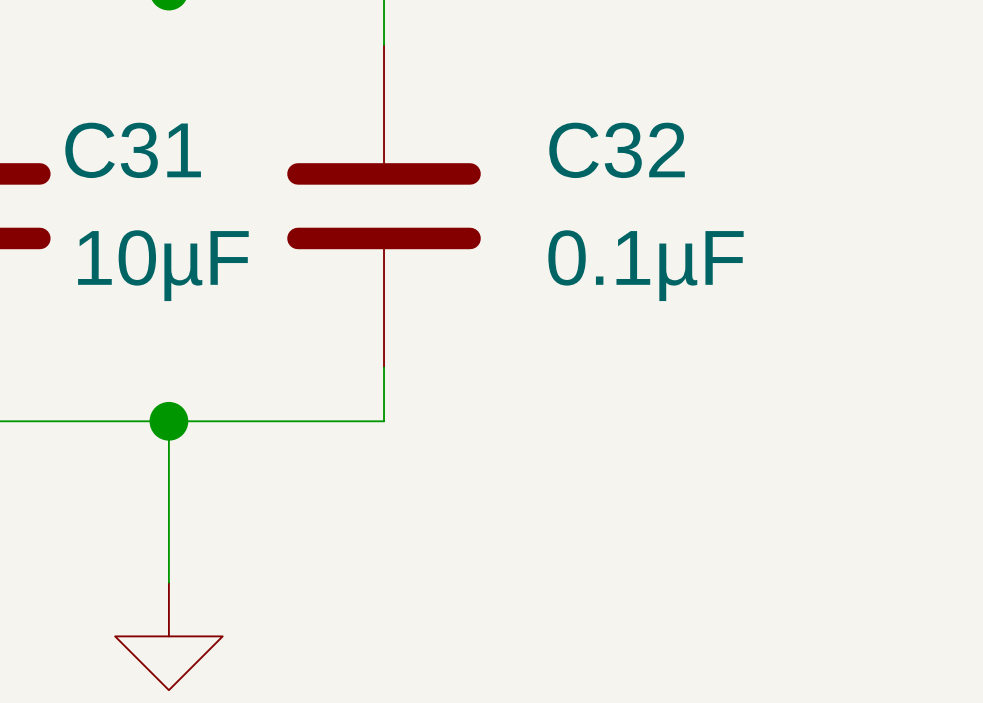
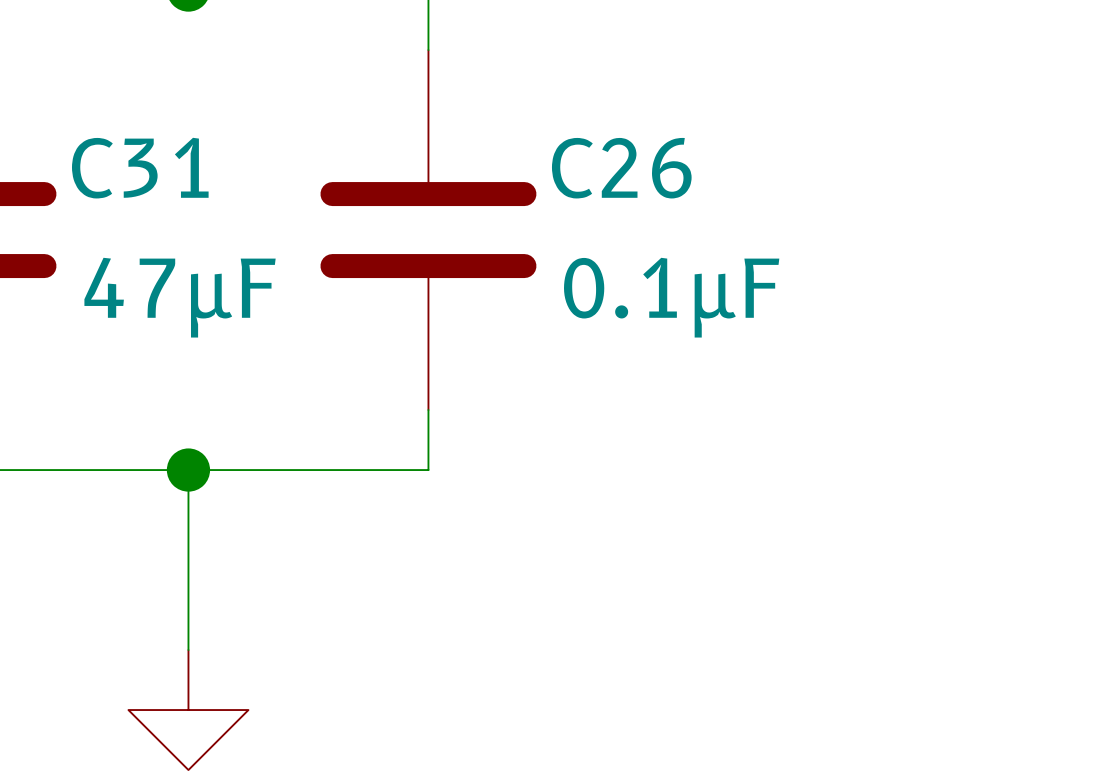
C32 name: C32 (617, 150) -> C26 (621, 168)
C31 value: 10µF (163, 265) -> 47µF (180, 297)
C32 value position: 0.1µF (646, 265) -> 0.1µF (671, 297)

